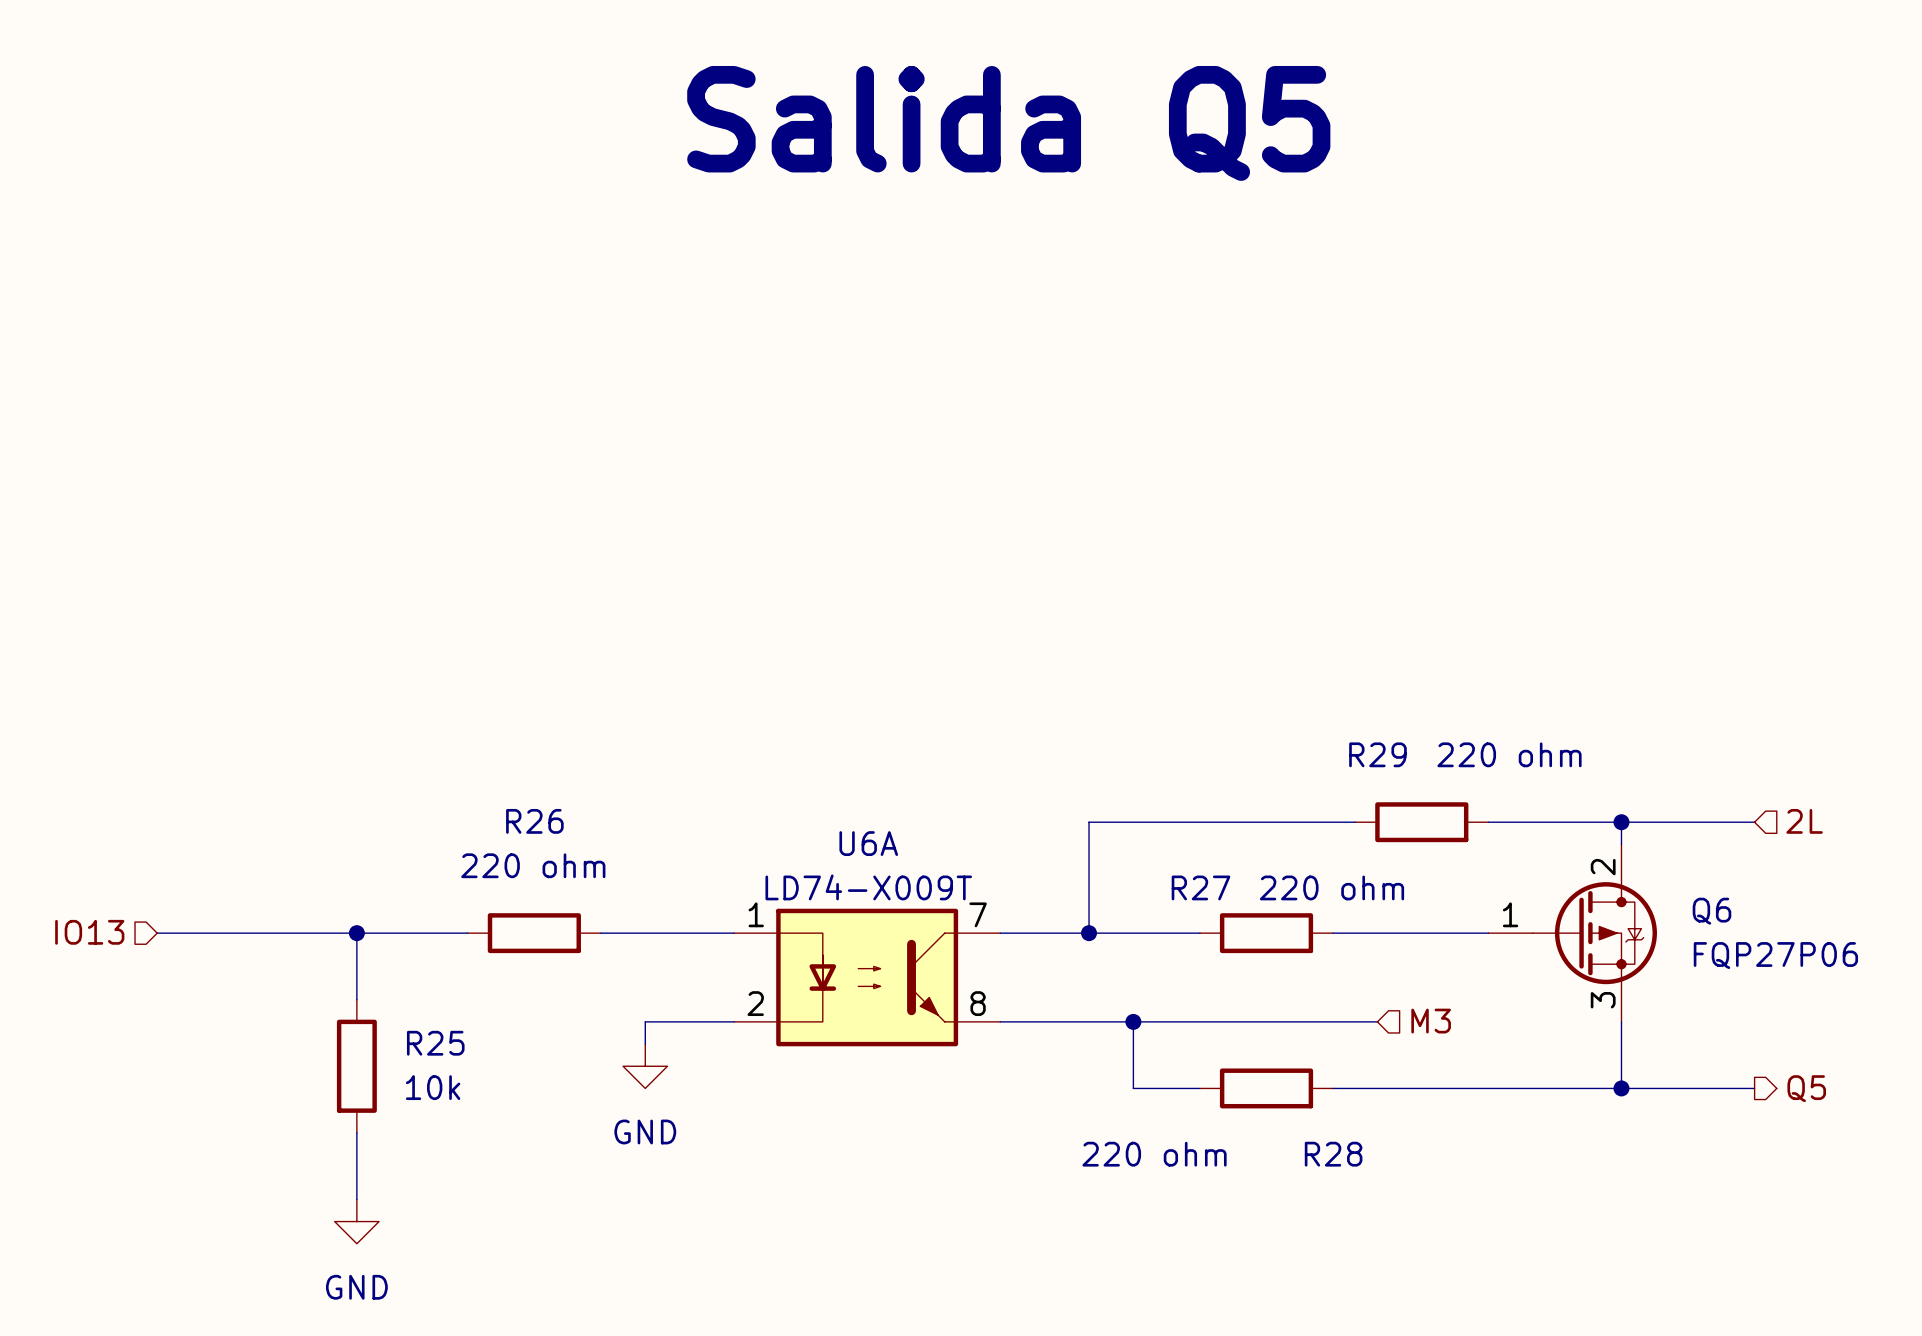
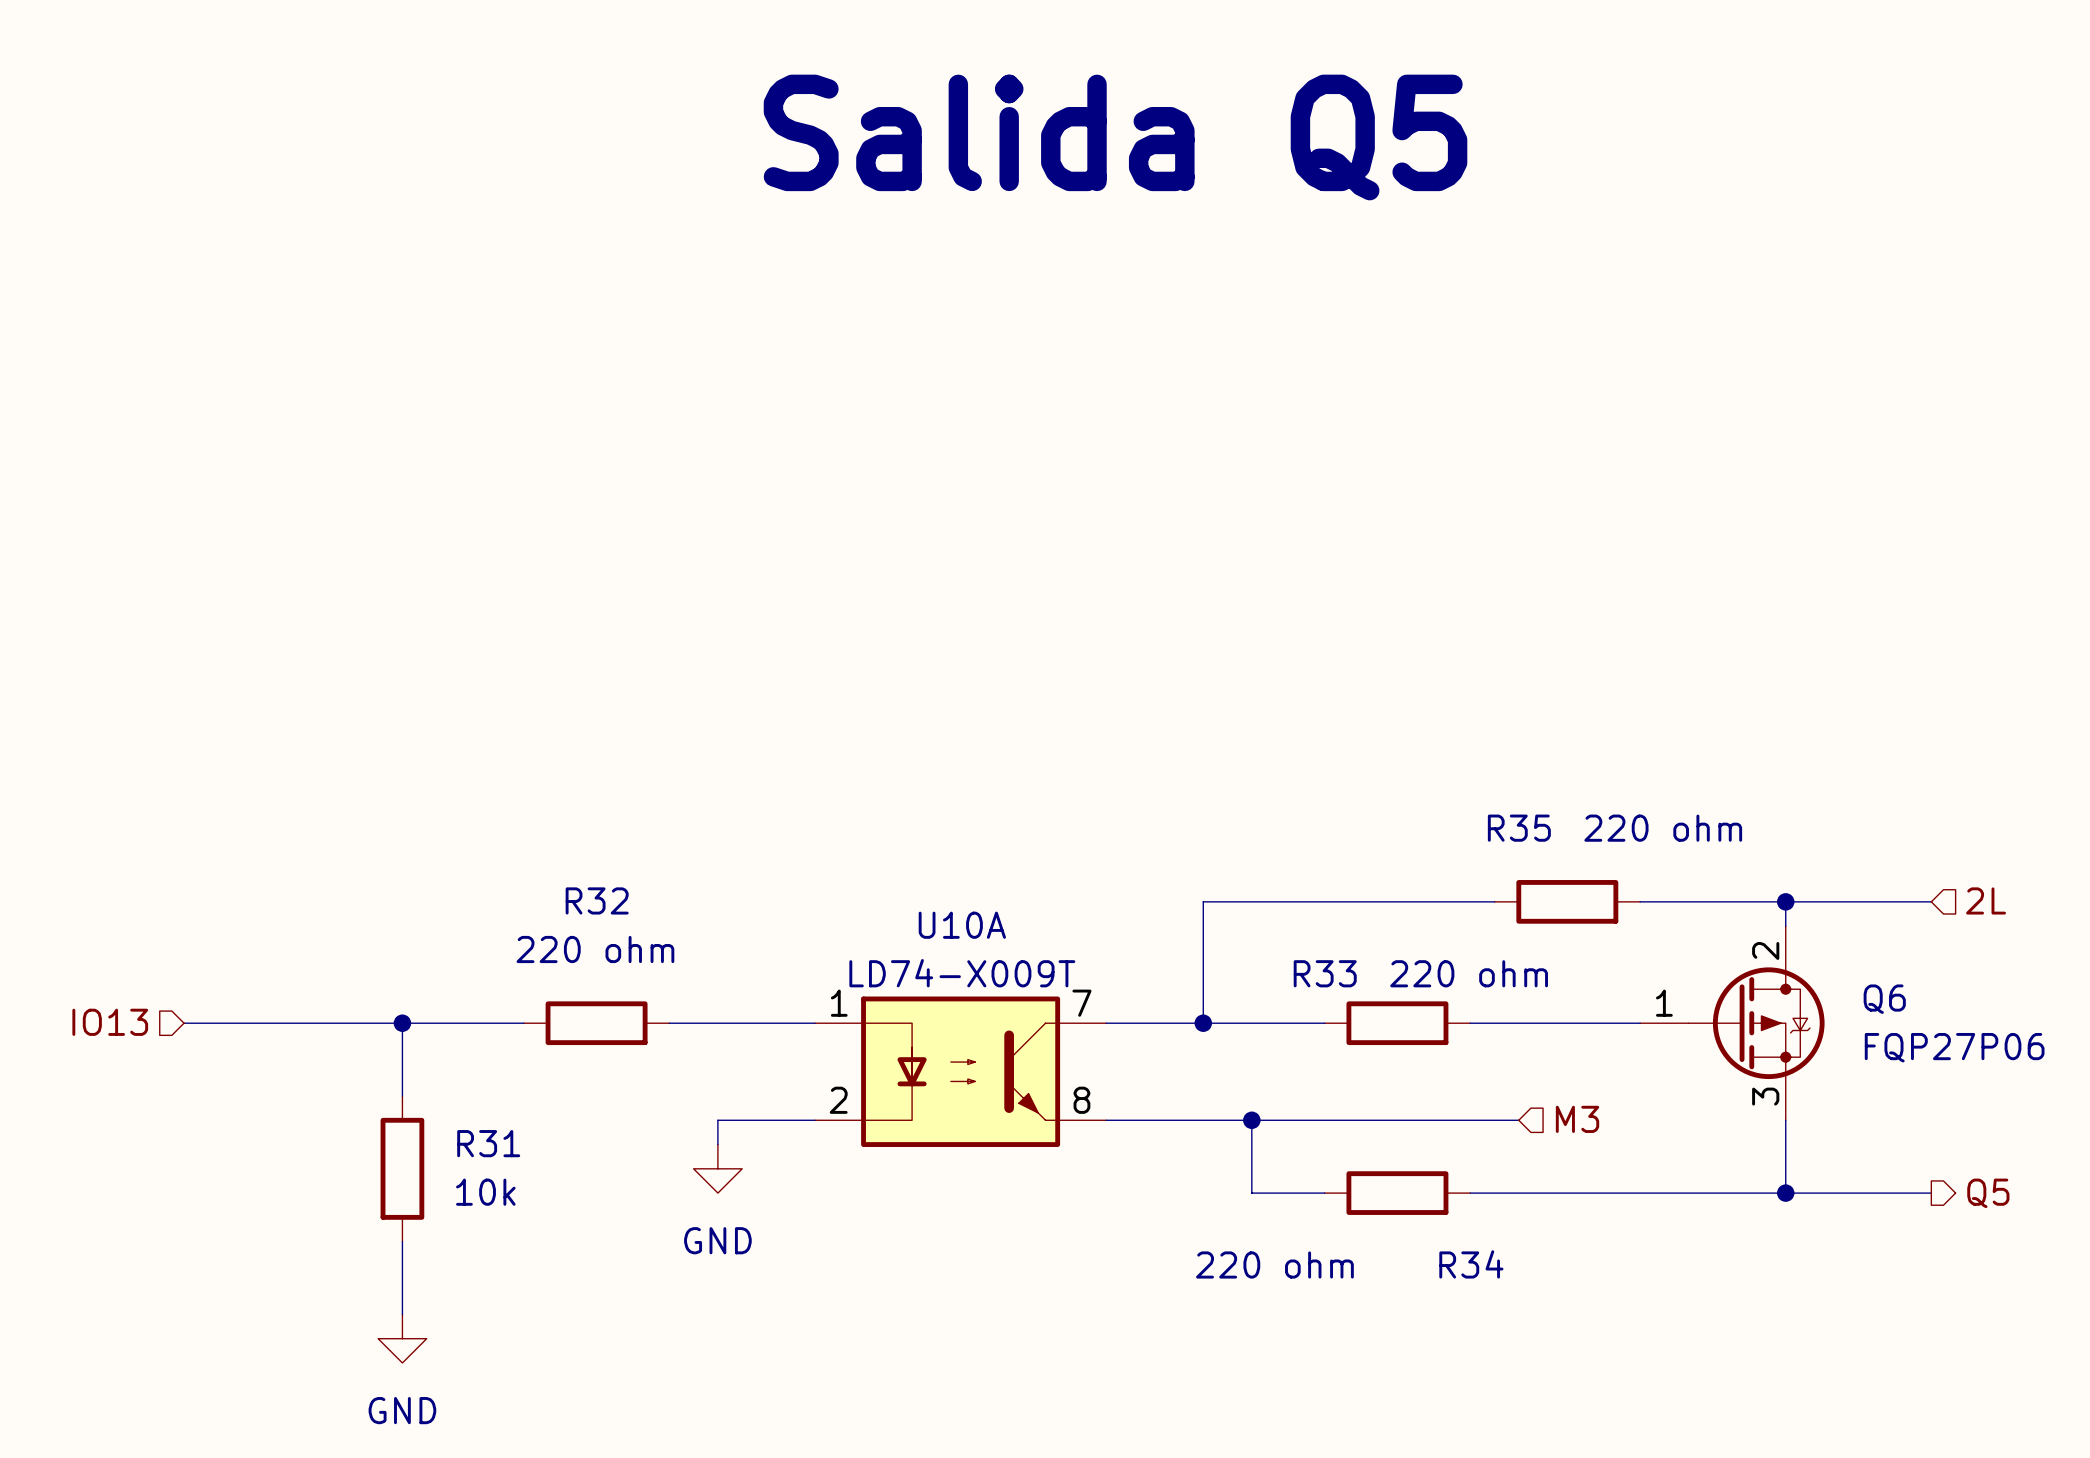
R29 name: R29 (1377, 754) -> R35 (1519, 828)
R26 name: R26 (534, 821) -> R32 (597, 900)
U6A name: U6A (868, 843) -> U10A (962, 925)
R27 name: R27 (1201, 887) -> R33 (1325, 973)
R25 name: R25 (435, 1043) -> R31 (488, 1143)
R28 name: R28 (1333, 1154) -> R34 (1471, 1264)

